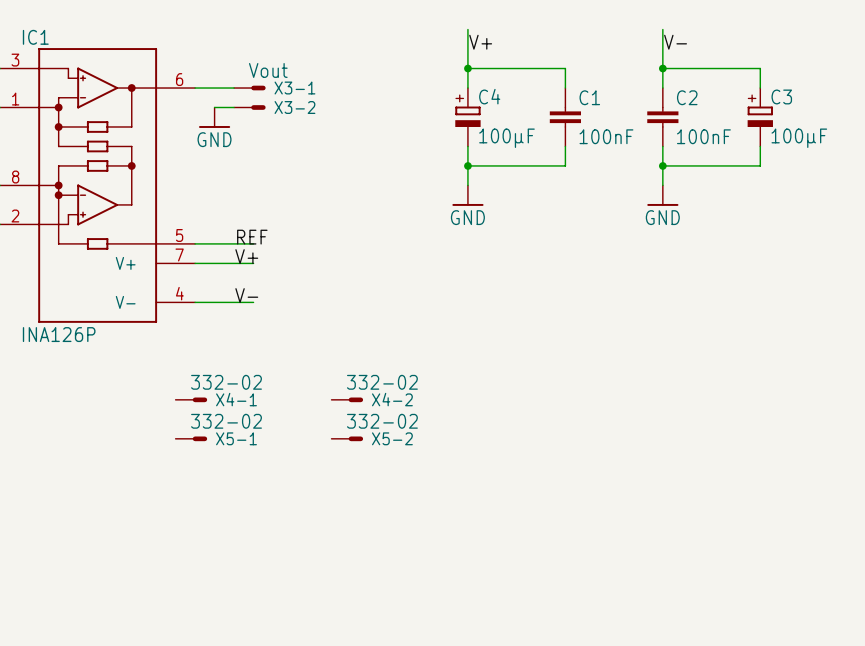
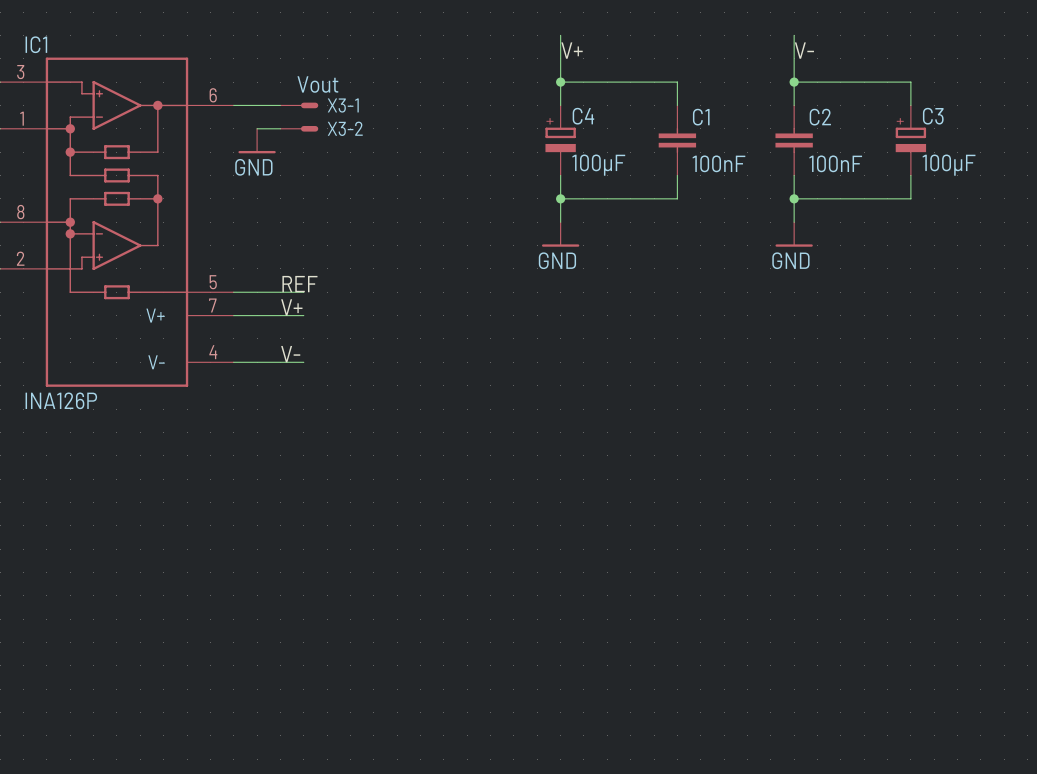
X4-1: 332-02 (191, 399) -> none
X4-2: 332-02 (347, 399) -> none
X5-1: 332-02 (191, 438) -> none
X5-2: 332-02 (347, 438) -> none

